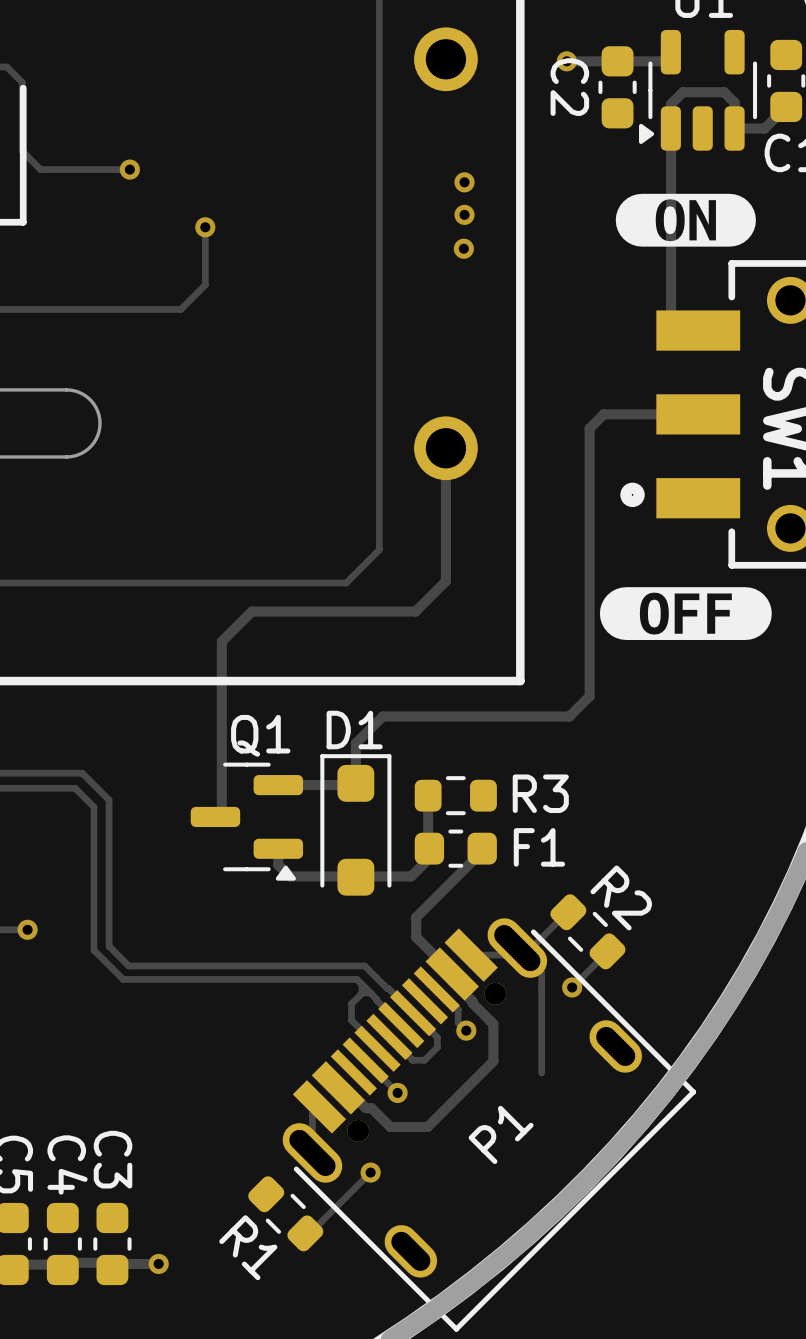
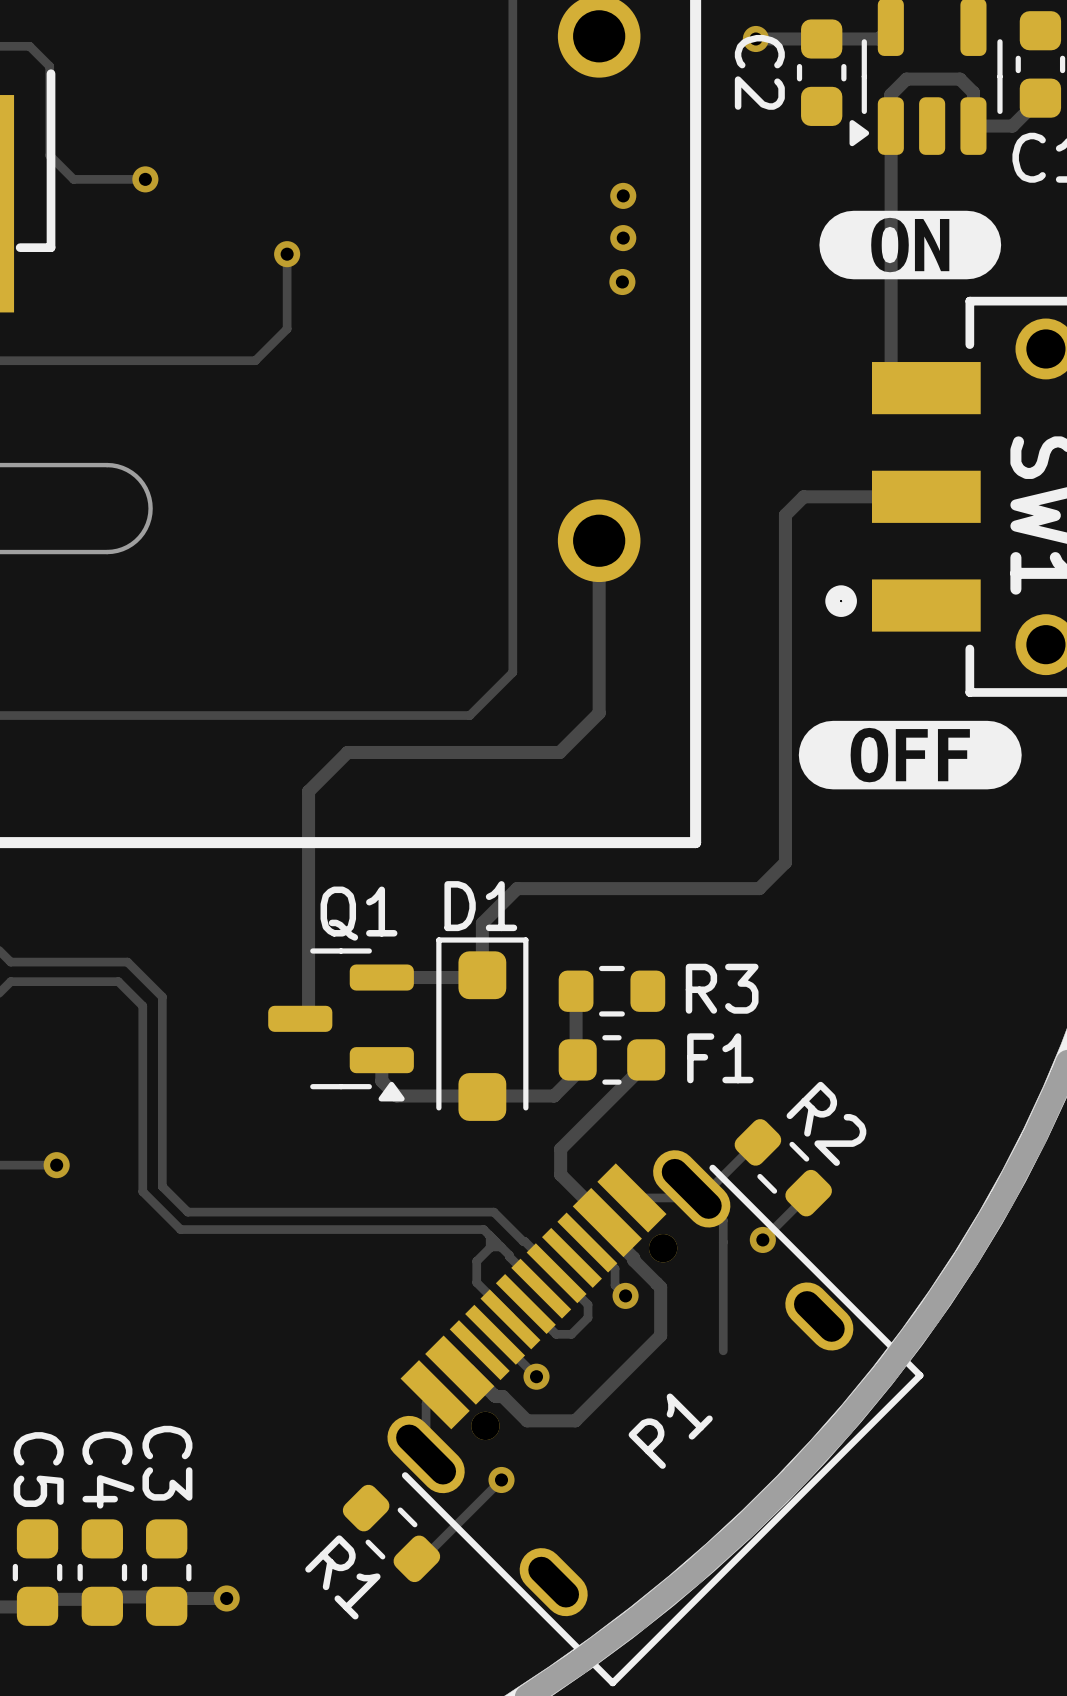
track: (129, 169) (95, 169) -> none
via position: (129, 169) -> (145, 179)

